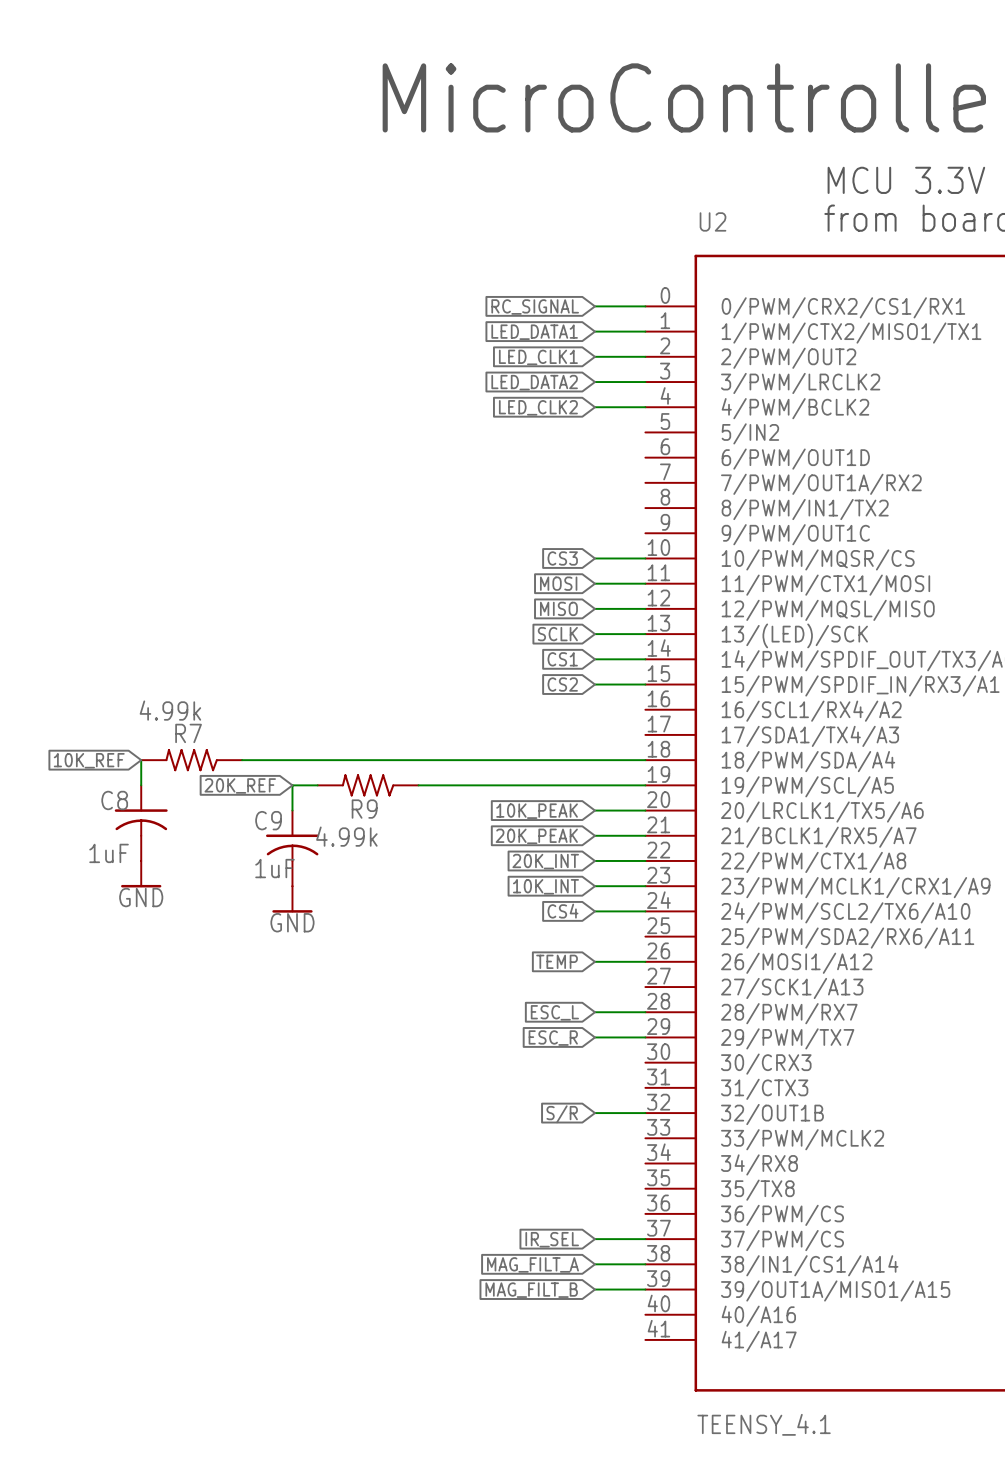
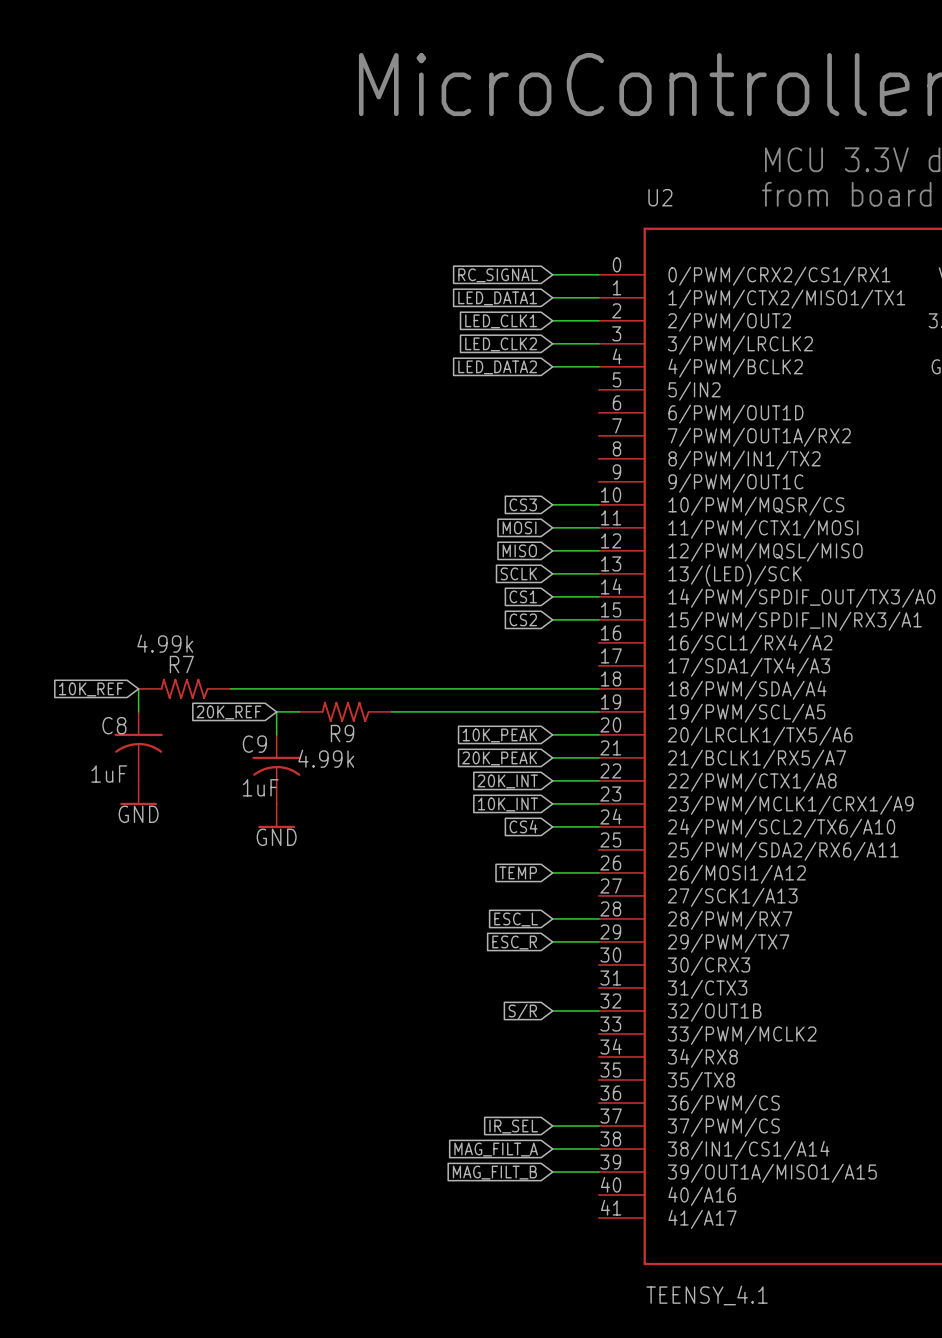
global label: LED_DATA2 (534, 382) -> LED_CLK2 (501, 344)
global label: LED_CLK2 (538, 407) -> LED_DATA2 (497, 367)

